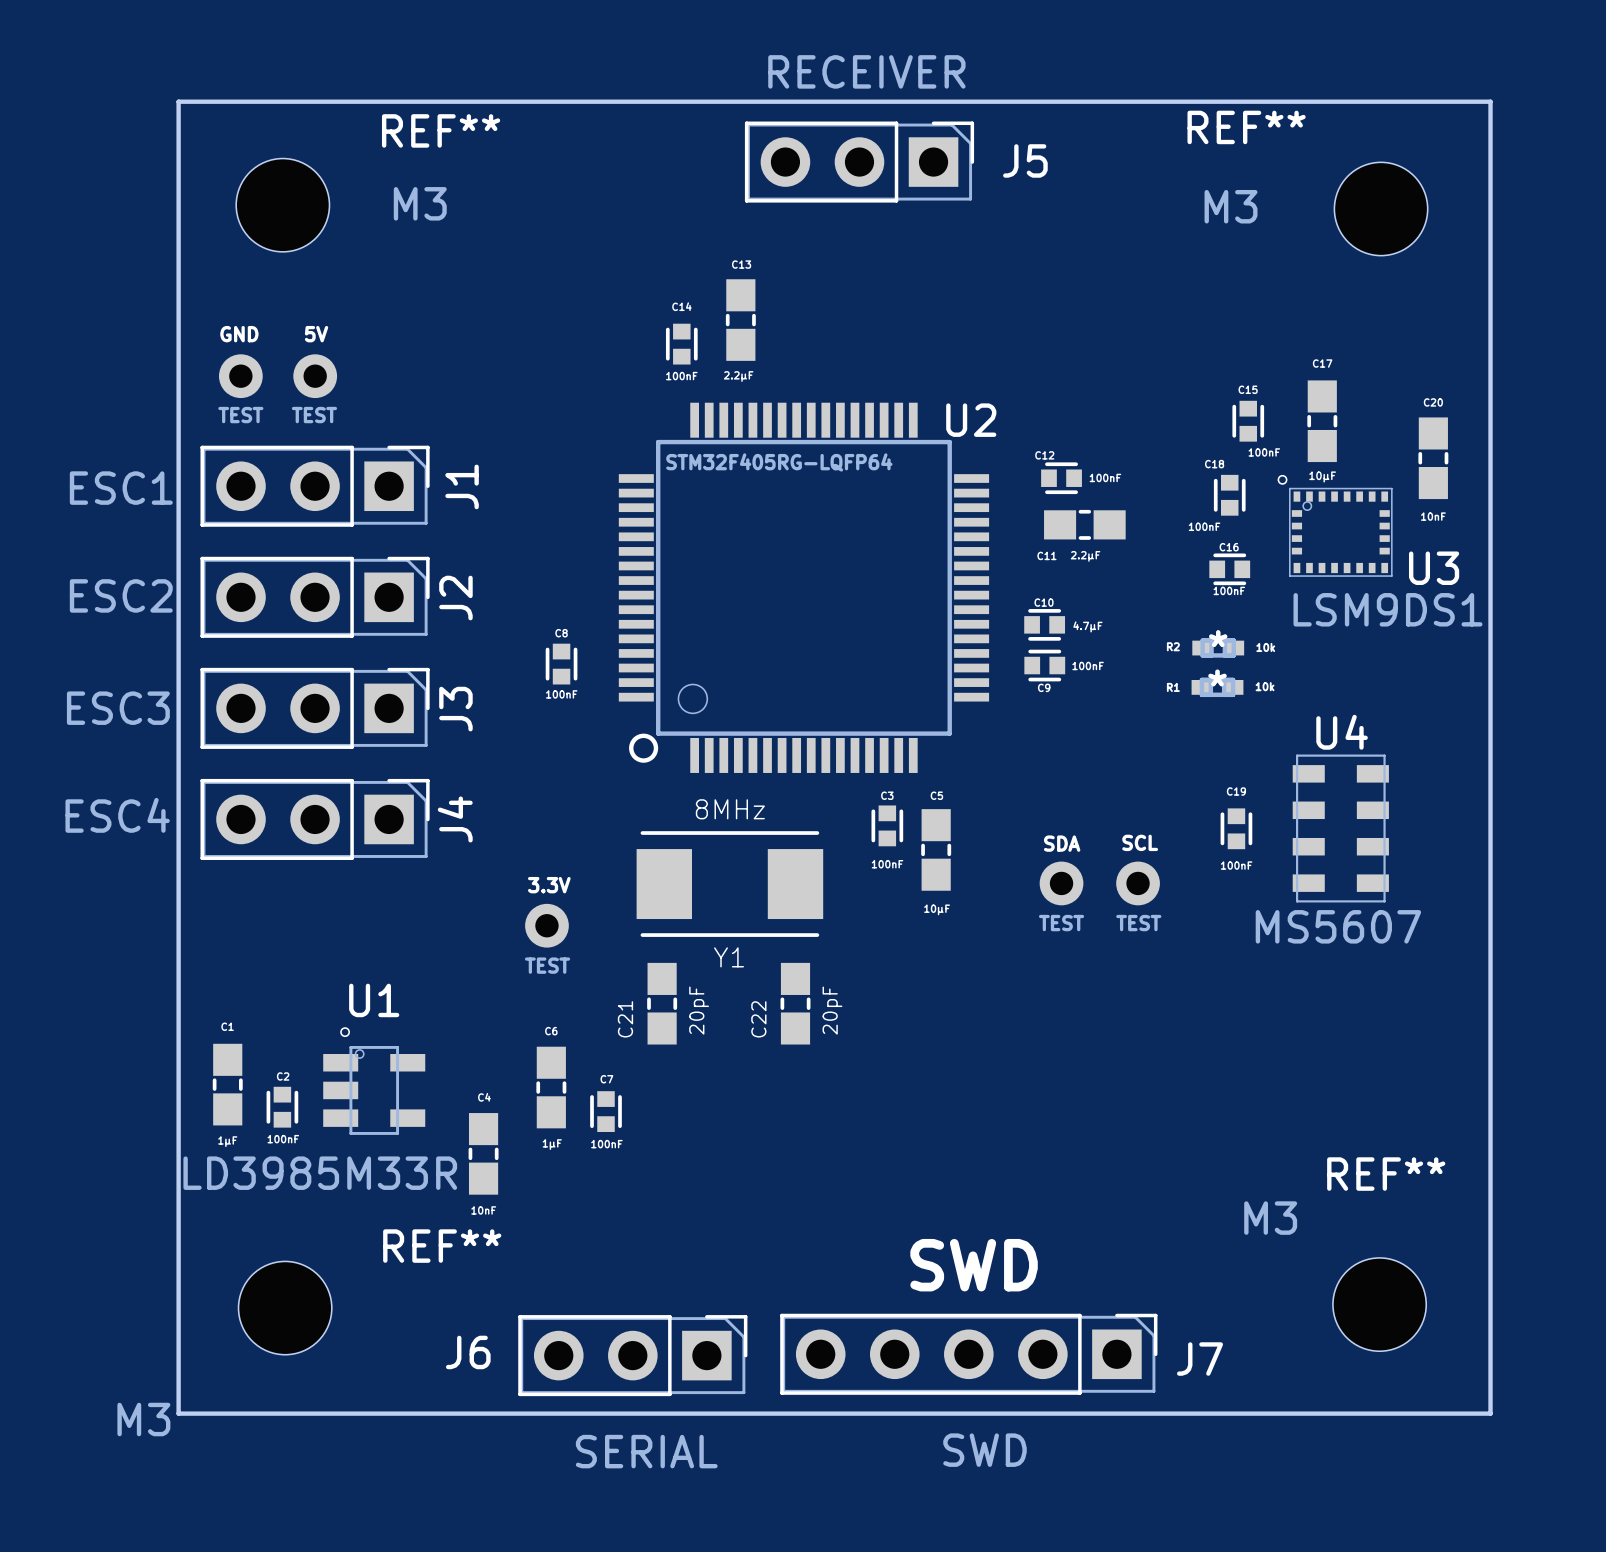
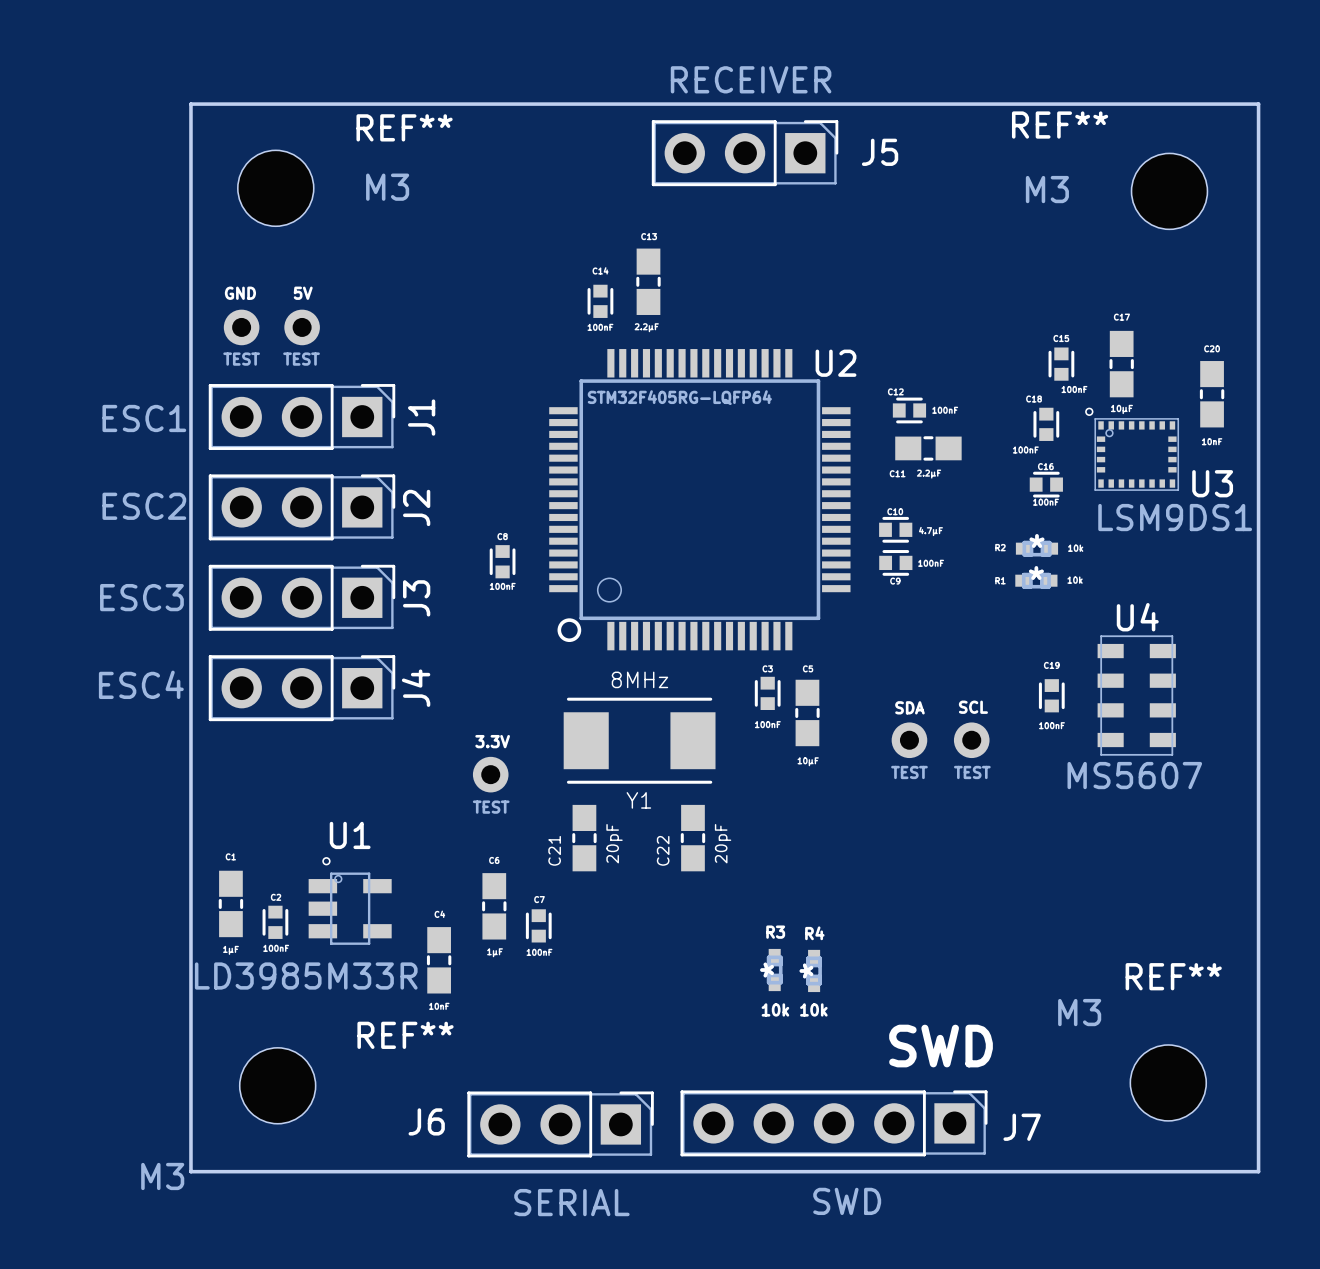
R3: none -> 10k (774, 970)
R4: none -> 10k (814, 970)
text position: SWD (974, 1265) -> SWD (941, 1046)

